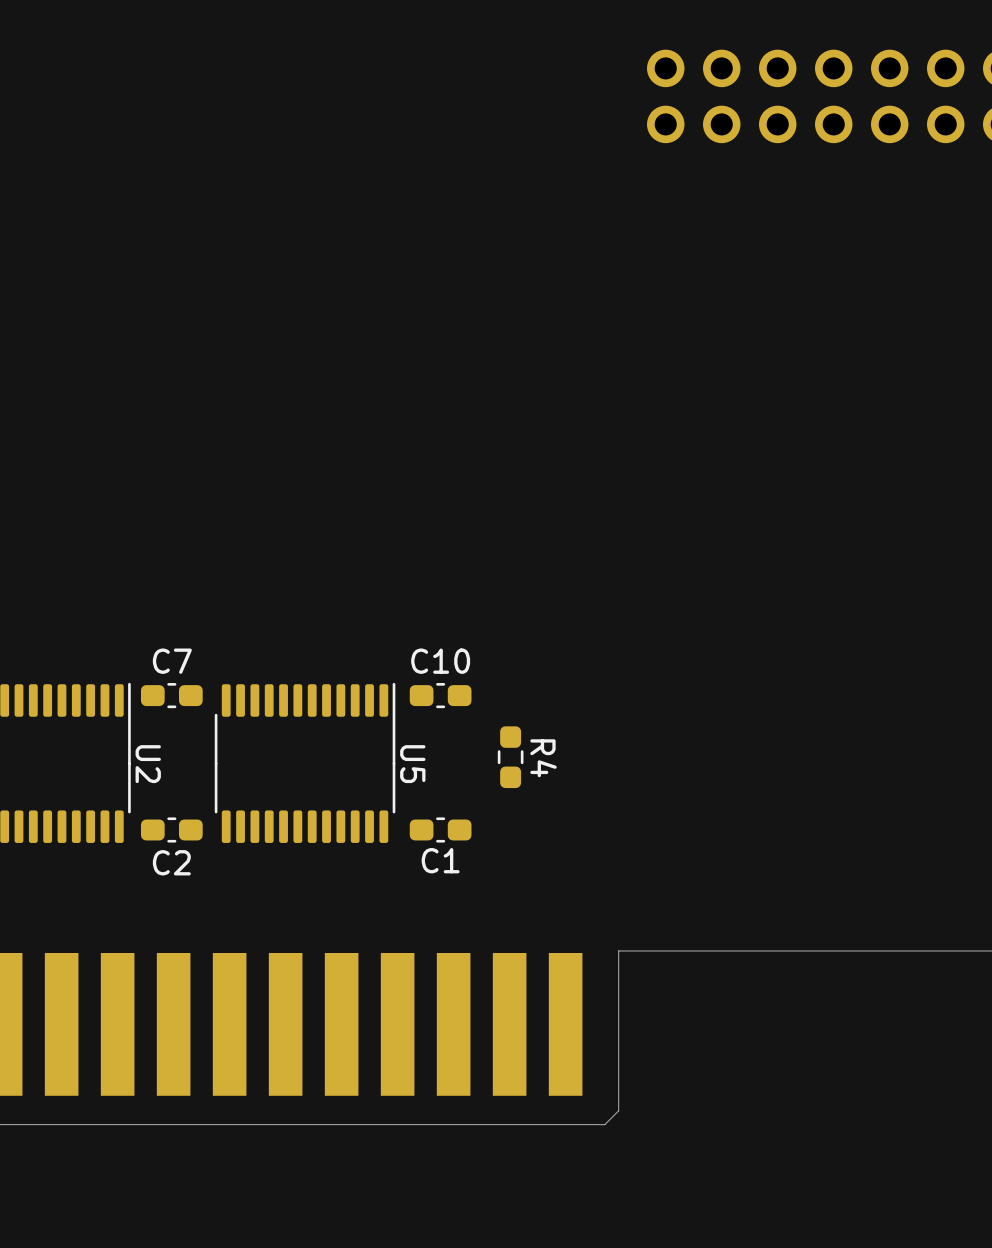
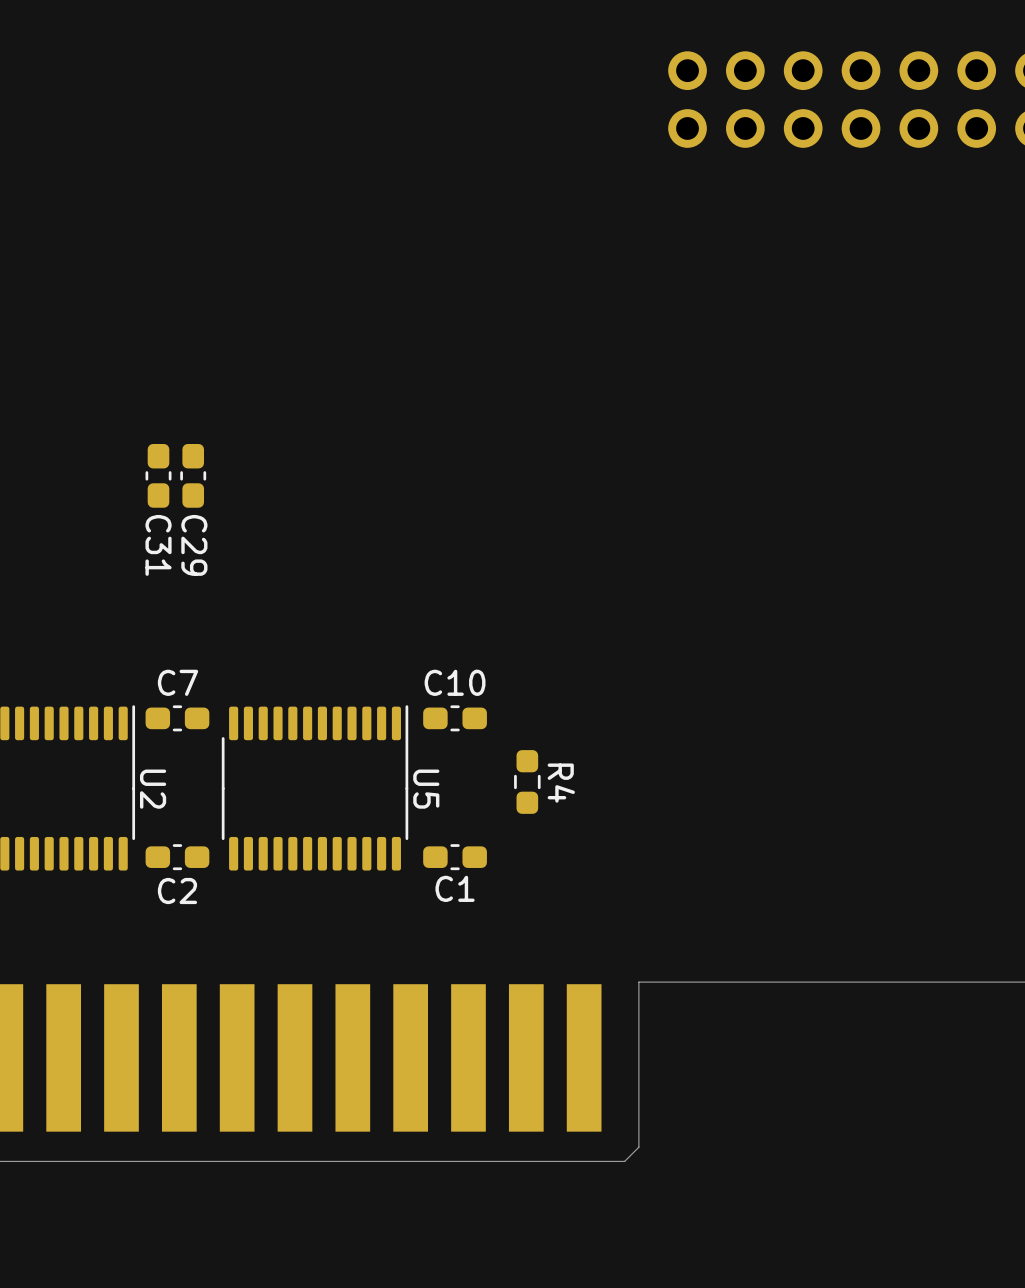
C31: none -> (158, 475)
C29: none -> (193, 475)

